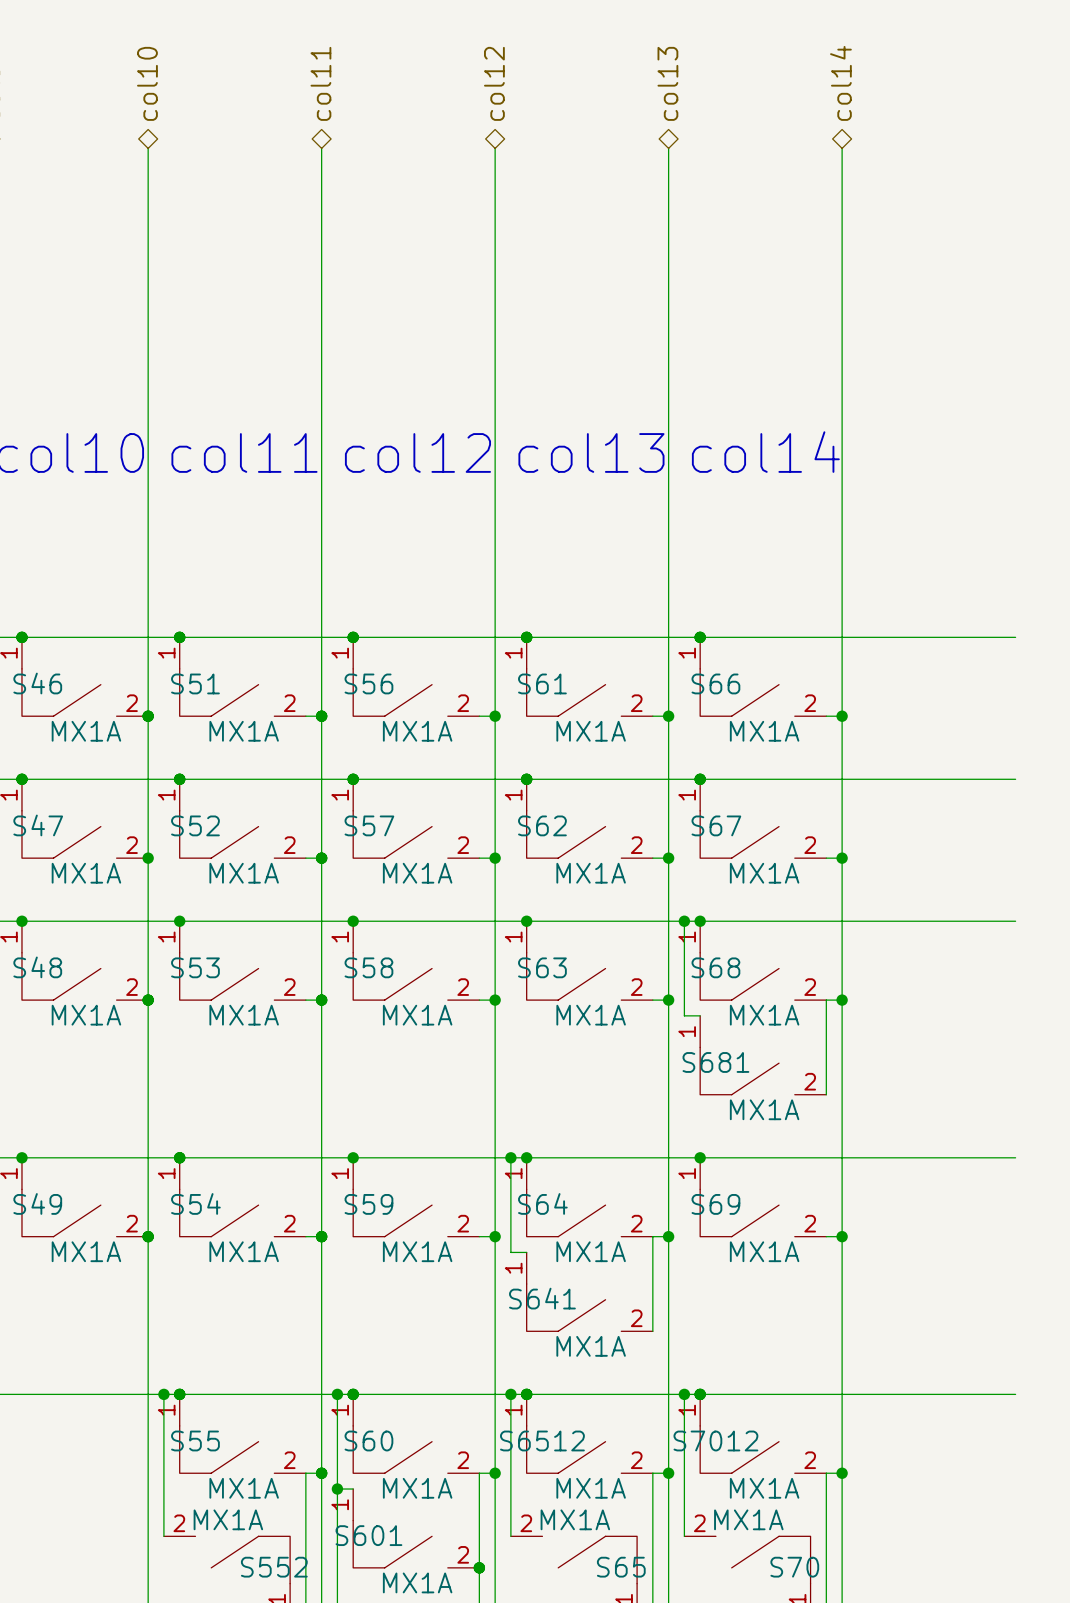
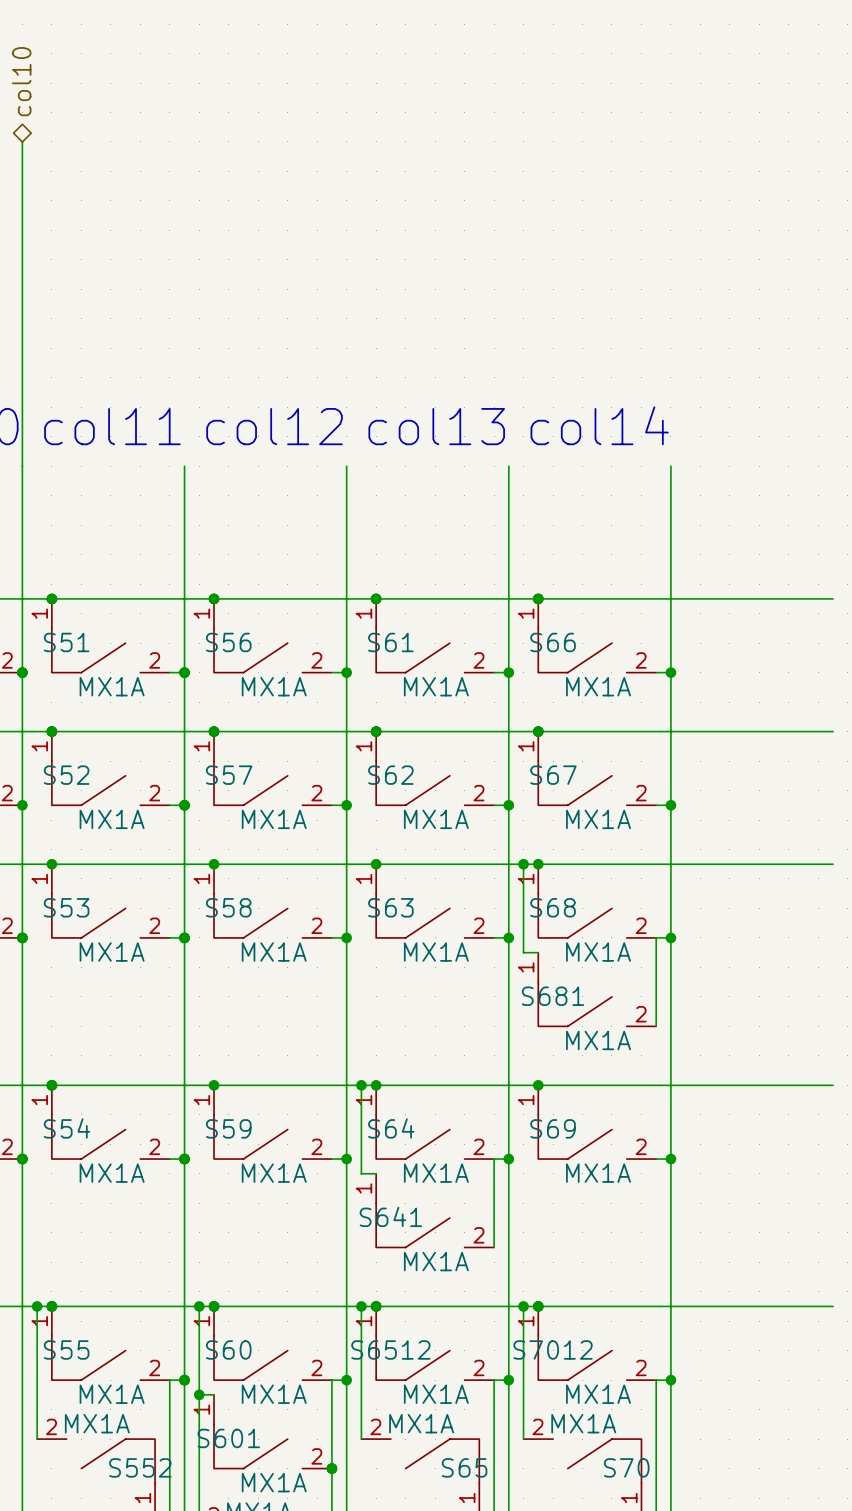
hierarchical label: col11 (320, 83) -> none
hierarchical label: col12 (494, 83) -> none
hierarchical label: col13 (667, 83) -> none
hierarchical label: col14 (840, 83) -> none
wire: (321, 148) (321, 495) -> none
wire: (495, 148) (495, 495) -> none
wire: (668, 148) (668, 495) -> none
wire: (842, 148) (842, 495) -> none

